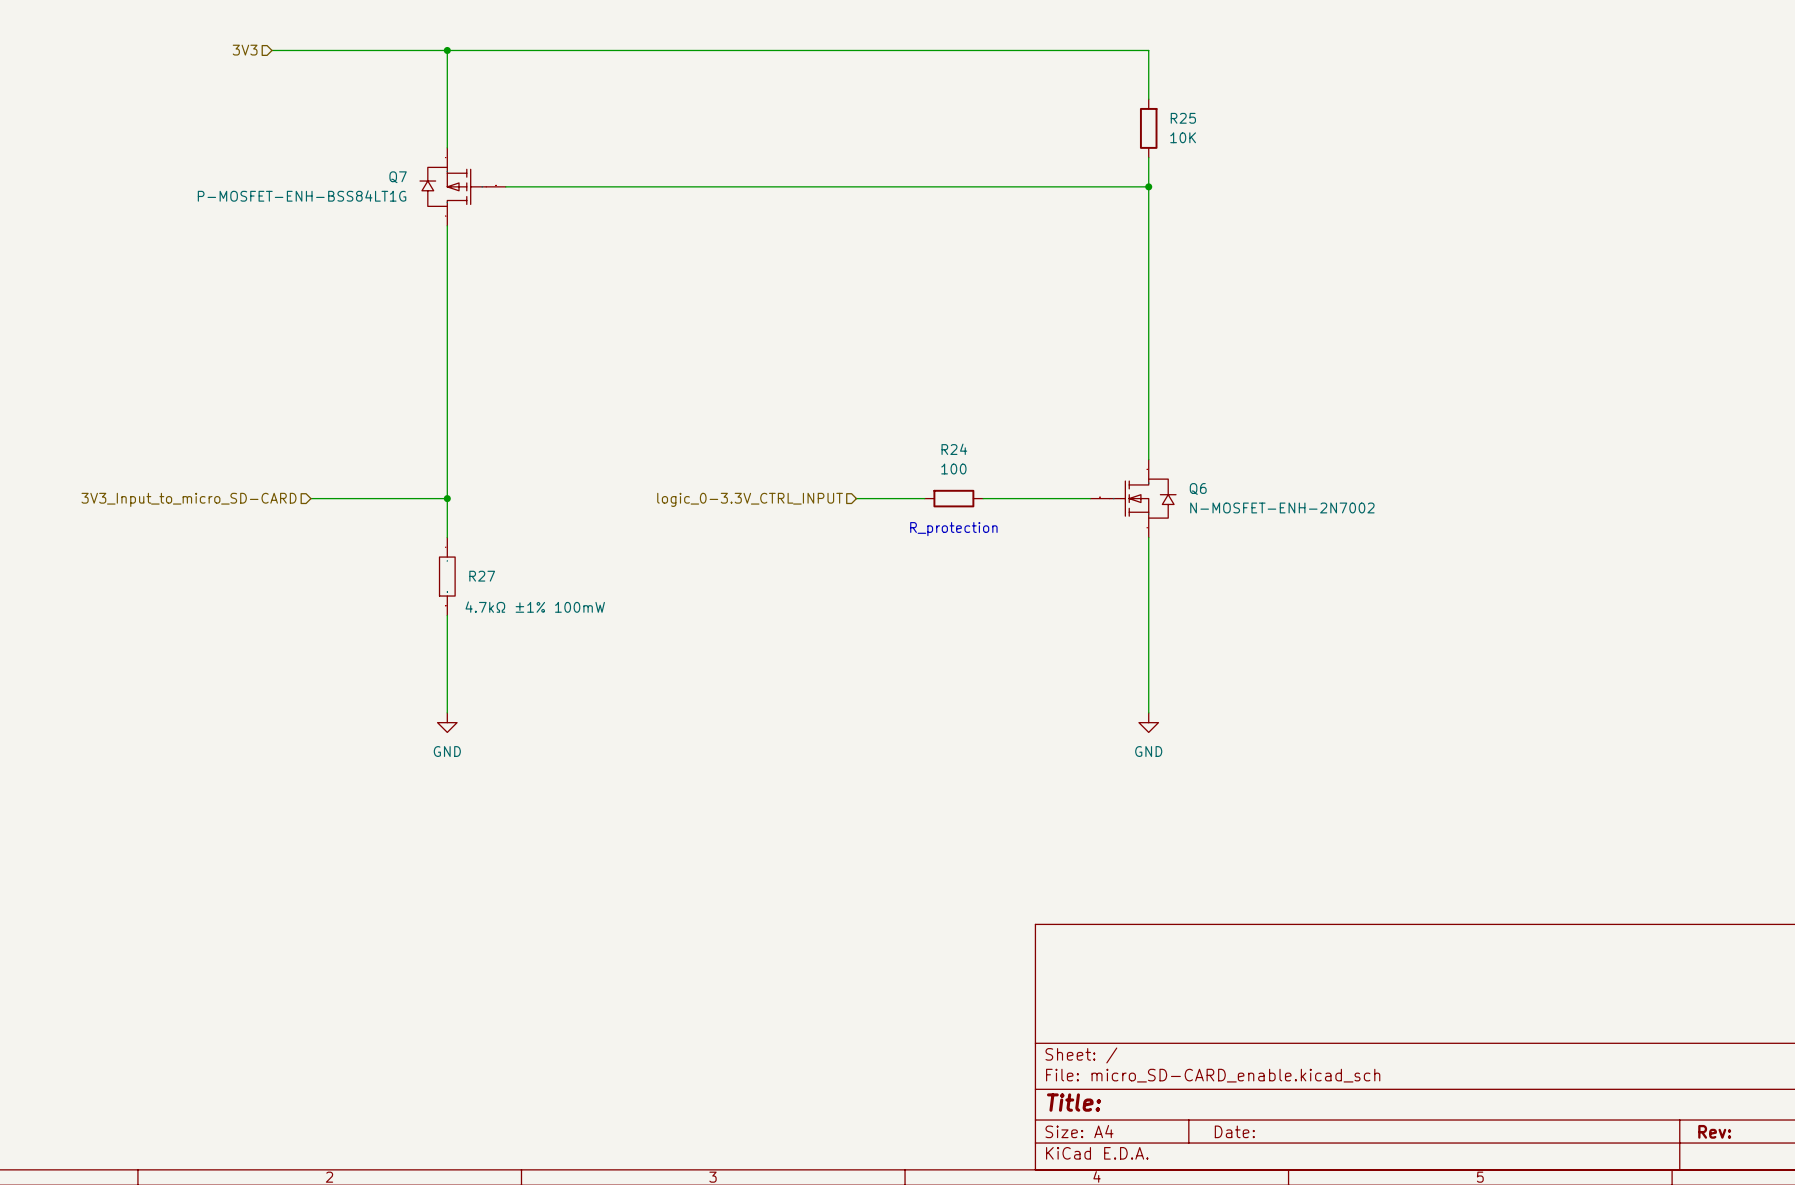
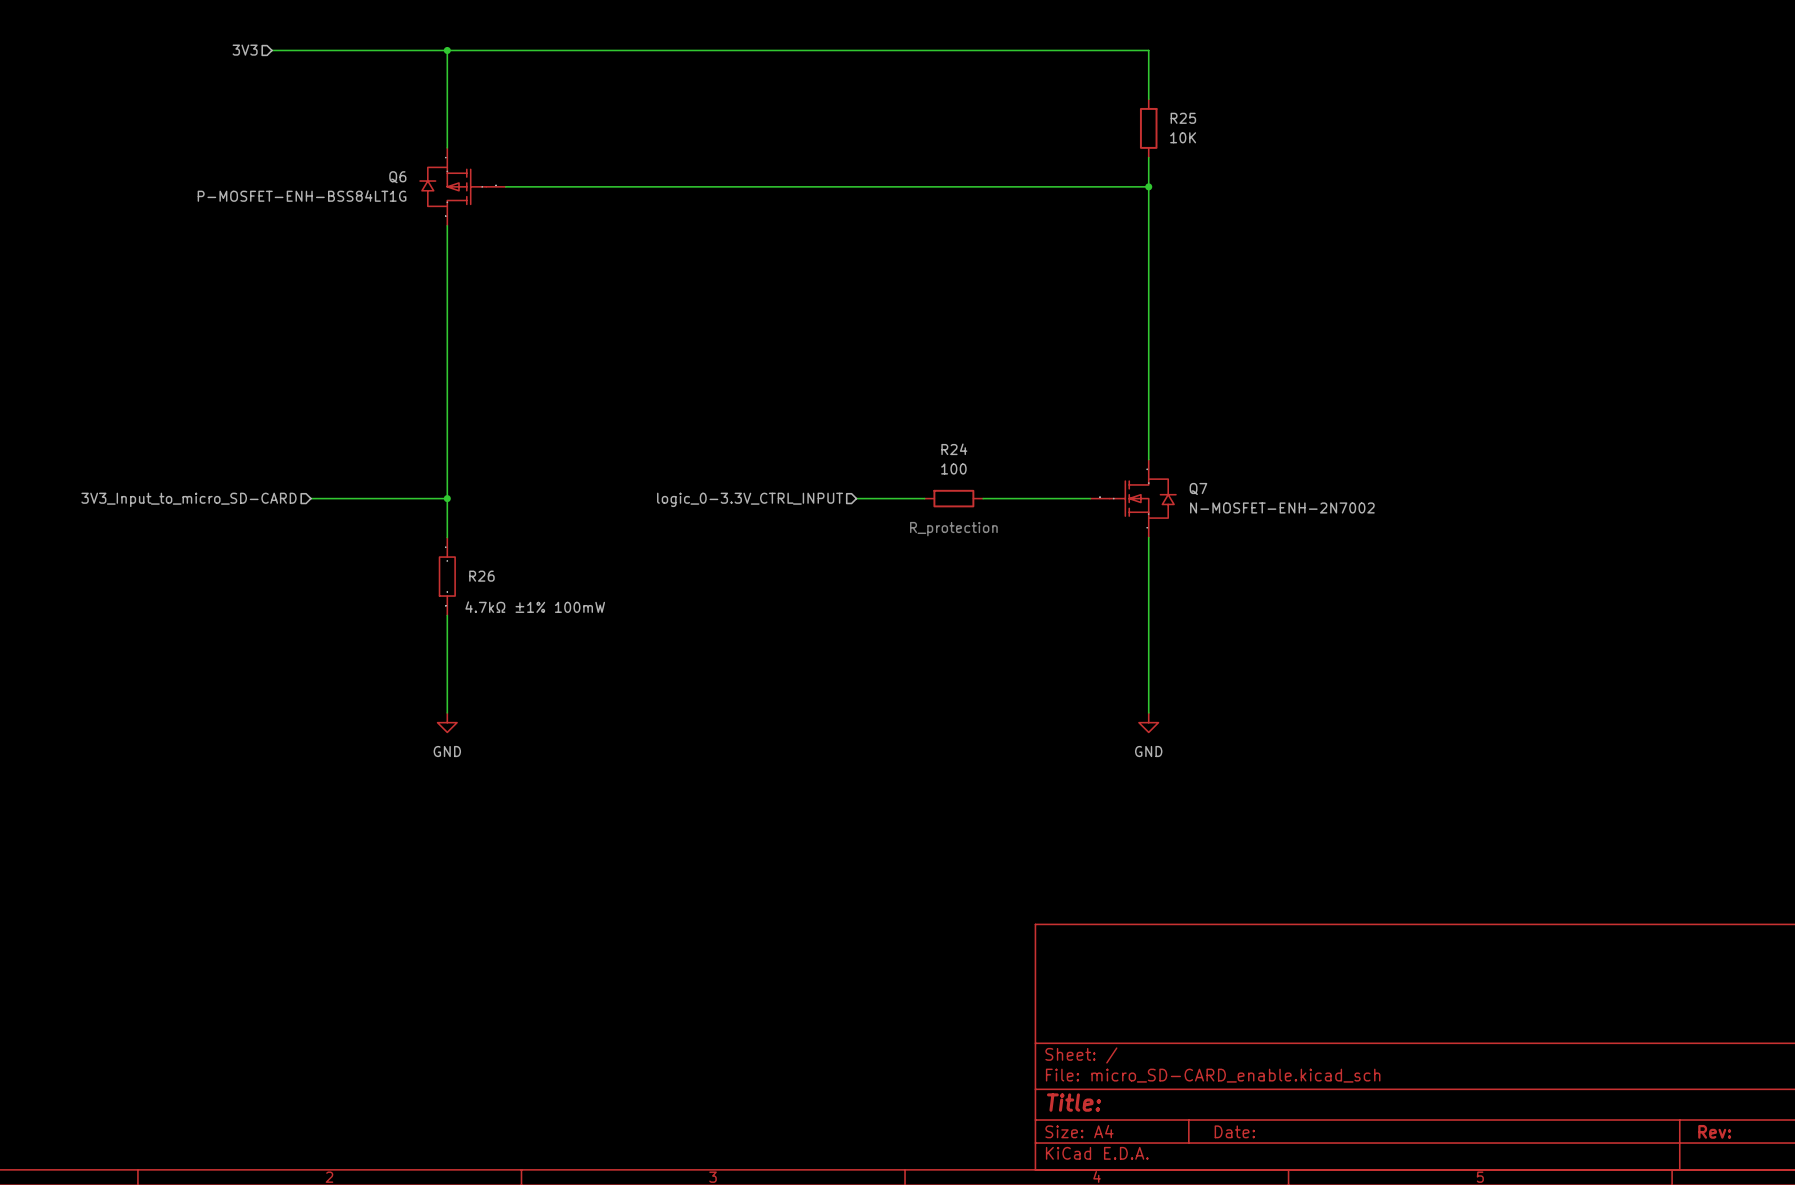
Q7 name: Q7 (398, 177) -> Q6 (397, 177)
Q6 name: Q6 (1198, 488) -> Q7 (1198, 488)
R27 name: R27 (482, 576) -> R26 (481, 576)

